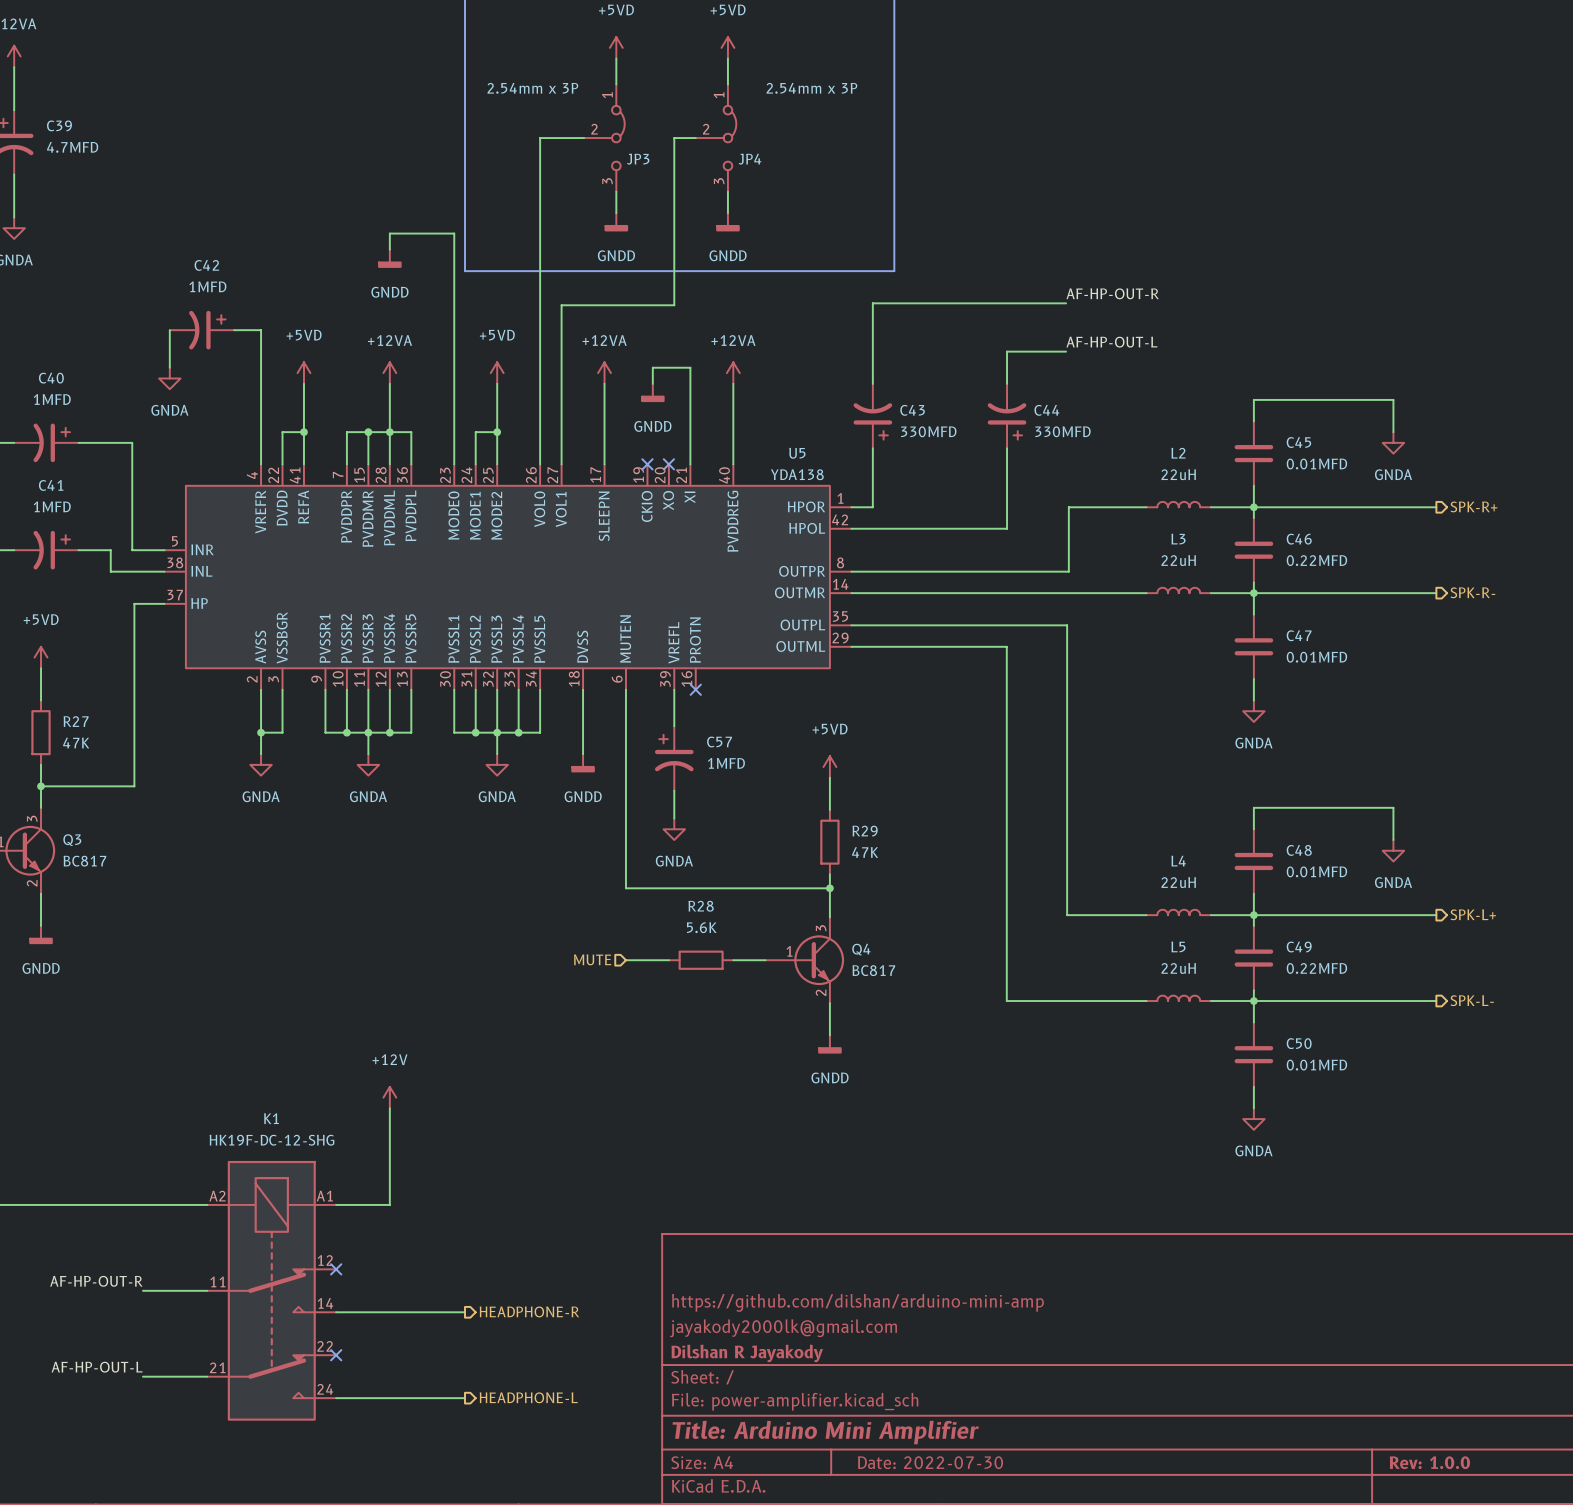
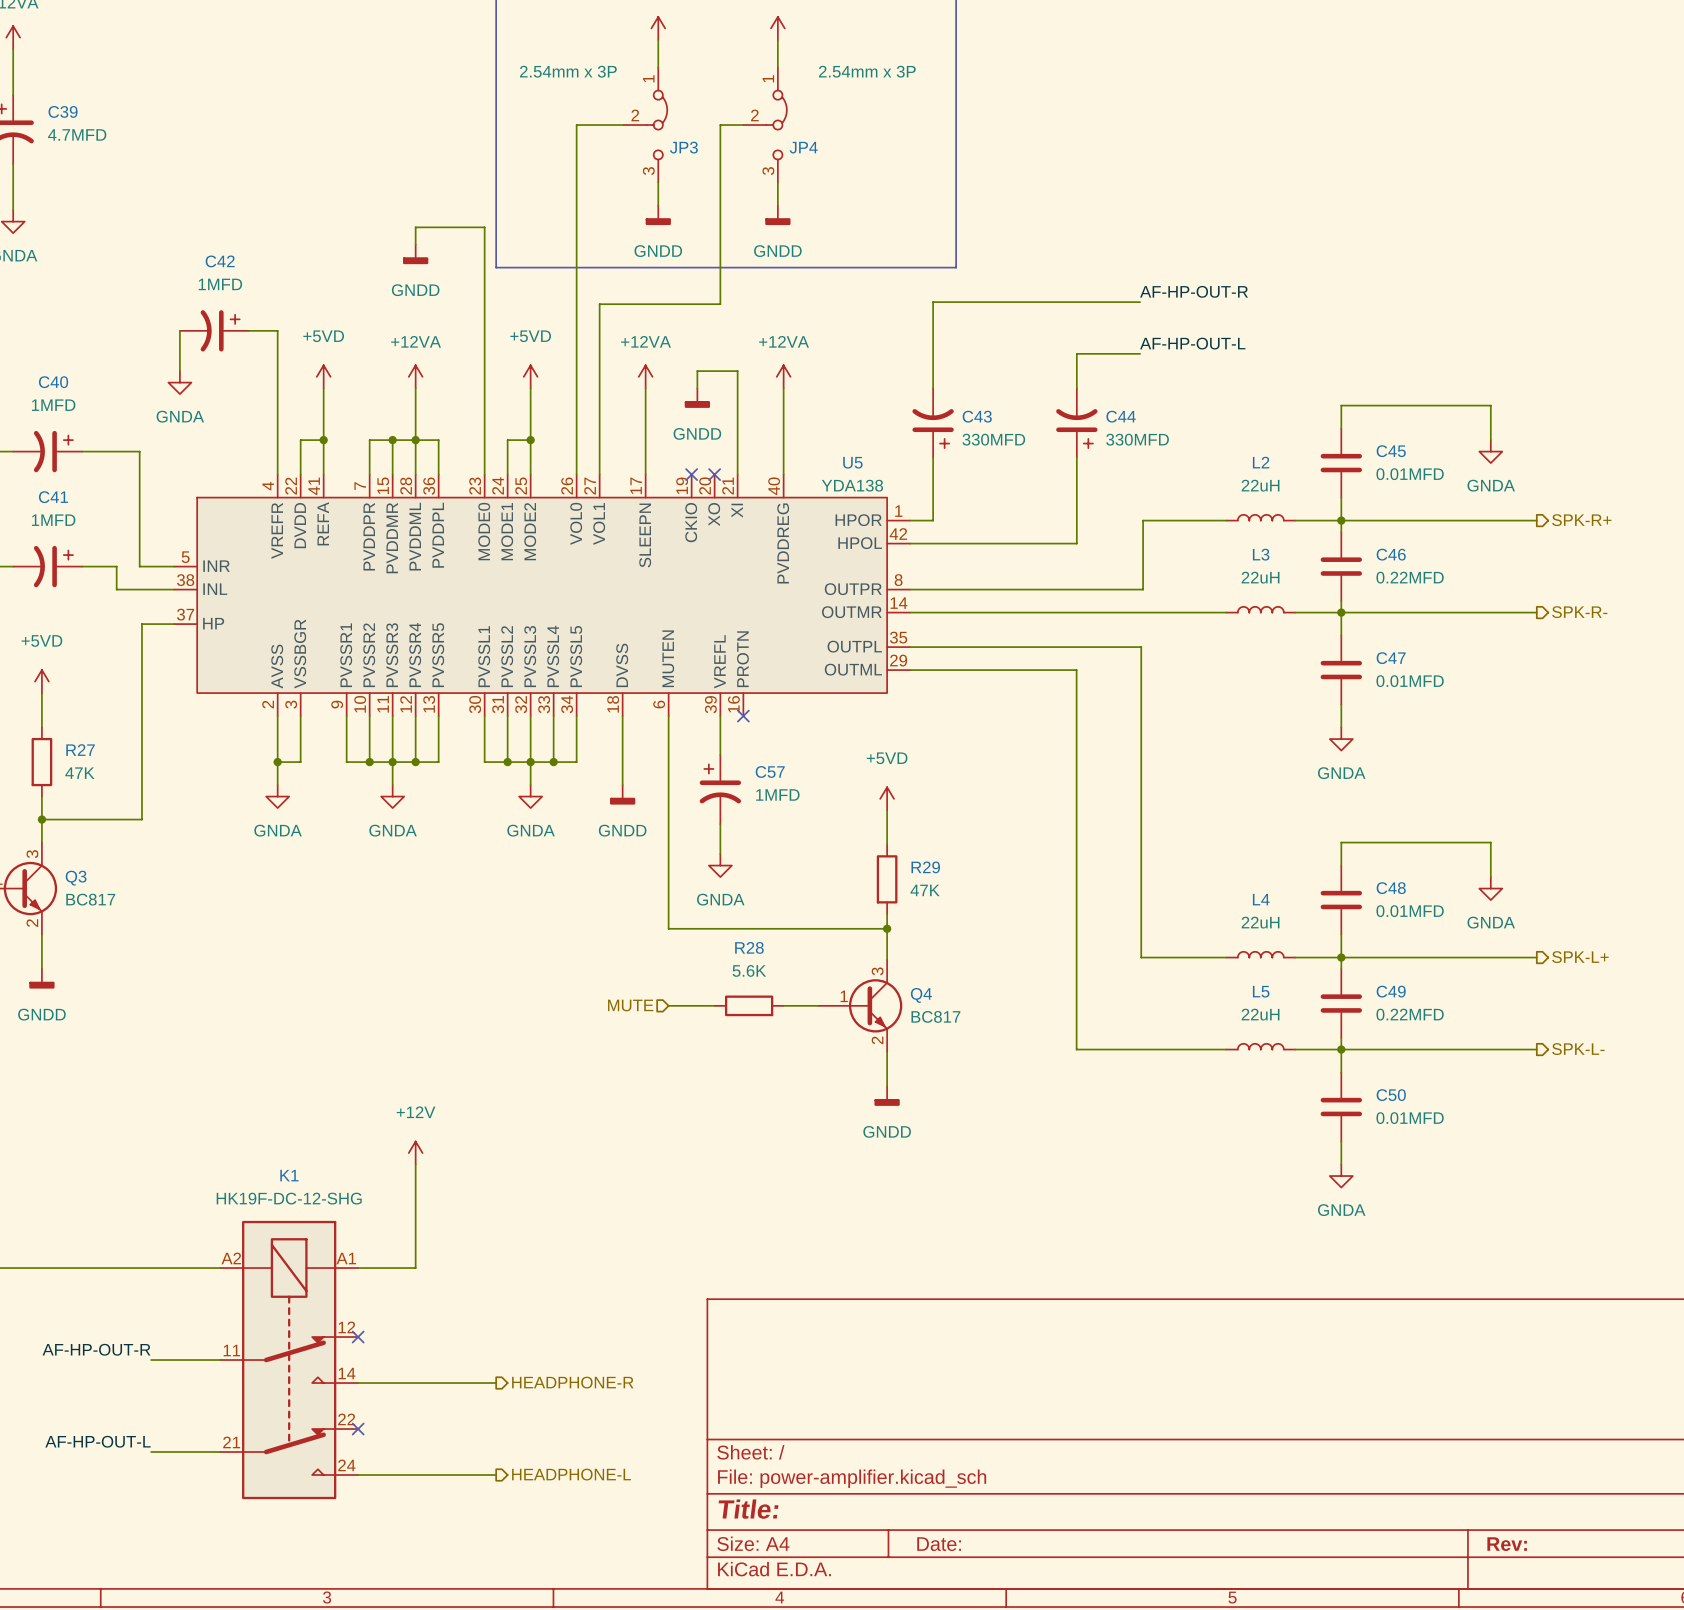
title block: https://github.com/dilshan/arduino-mini-amp (857, 1302) -> none
title block: jayakody2000lk@gmail.com (783, 1328) -> none
title block: Dilshan R Jayakody (747, 1353) -> none
title block: Title: Arduino Mini Amplifier (825, 1432) -> Title: (748, 1509)
title block: Date: 2022-07-30 (930, 1462) -> Date: (939, 1544)
title block: Rev: 1.0.0 (1429, 1462) -> Rev: (1507, 1544)

